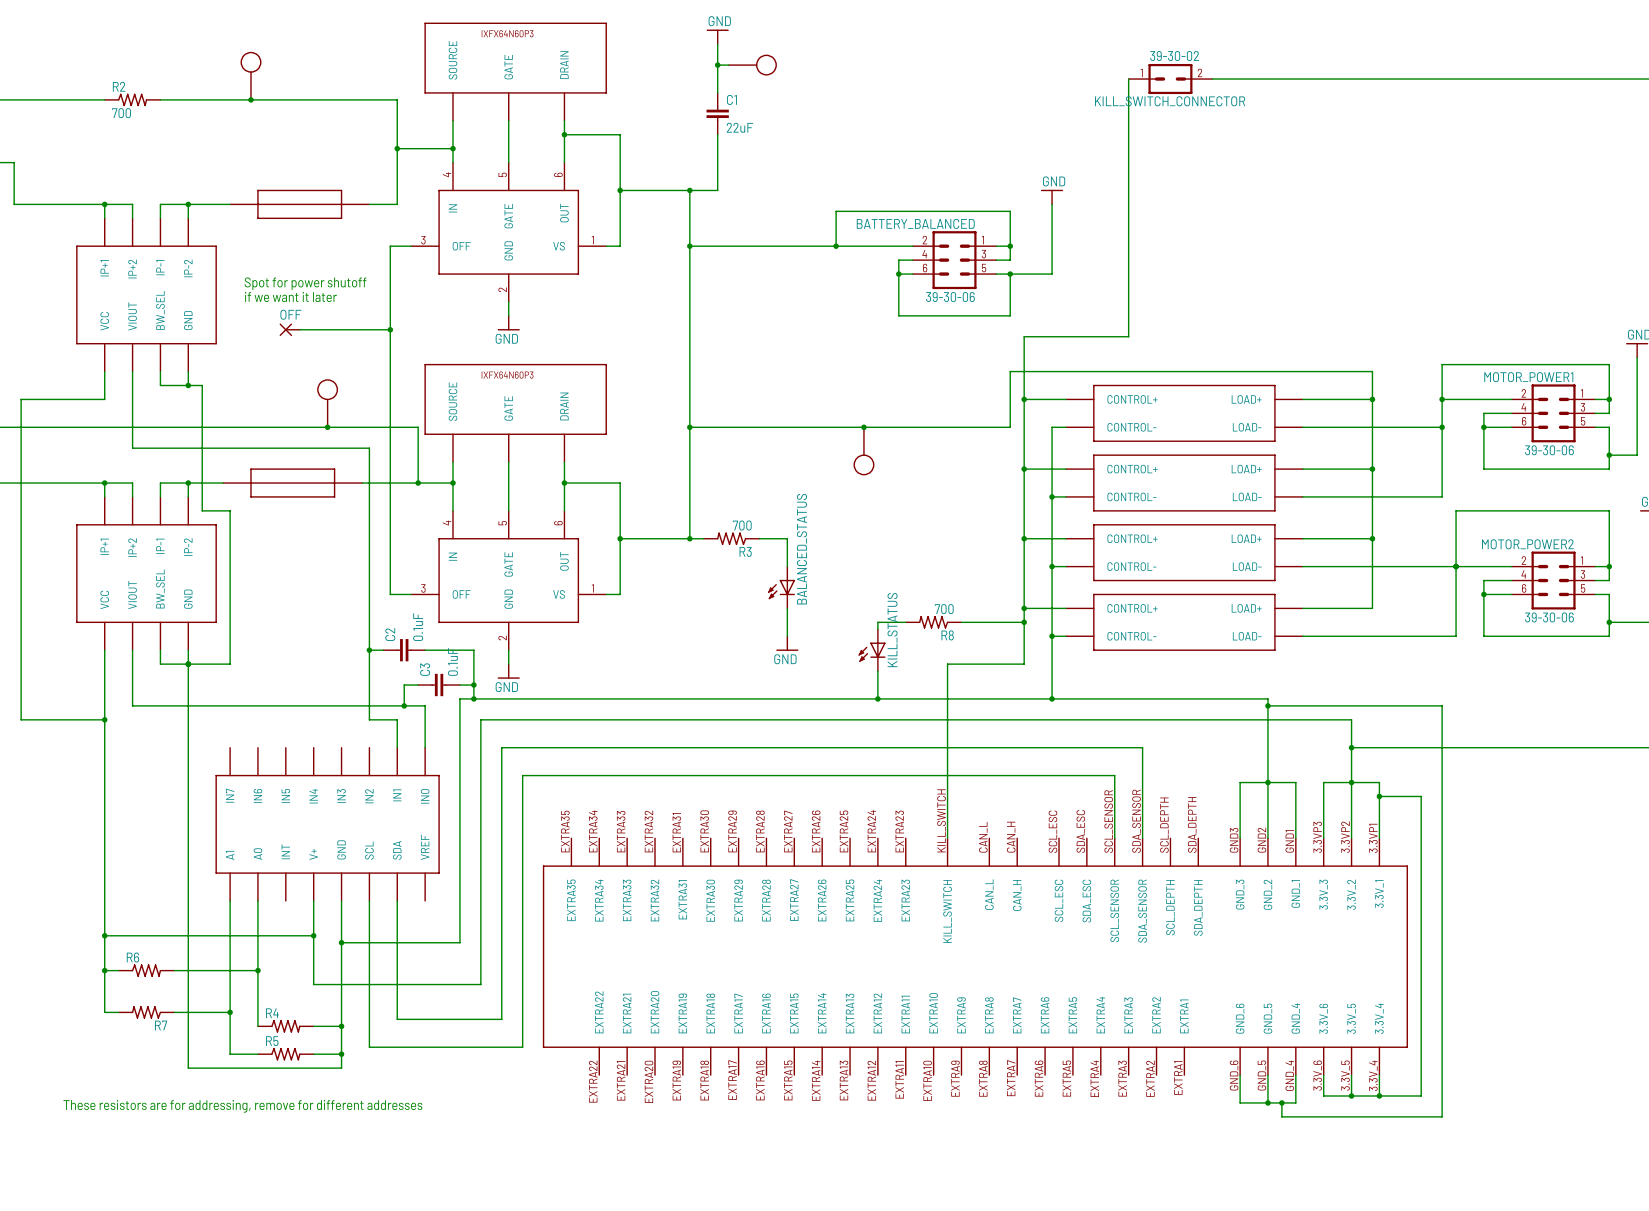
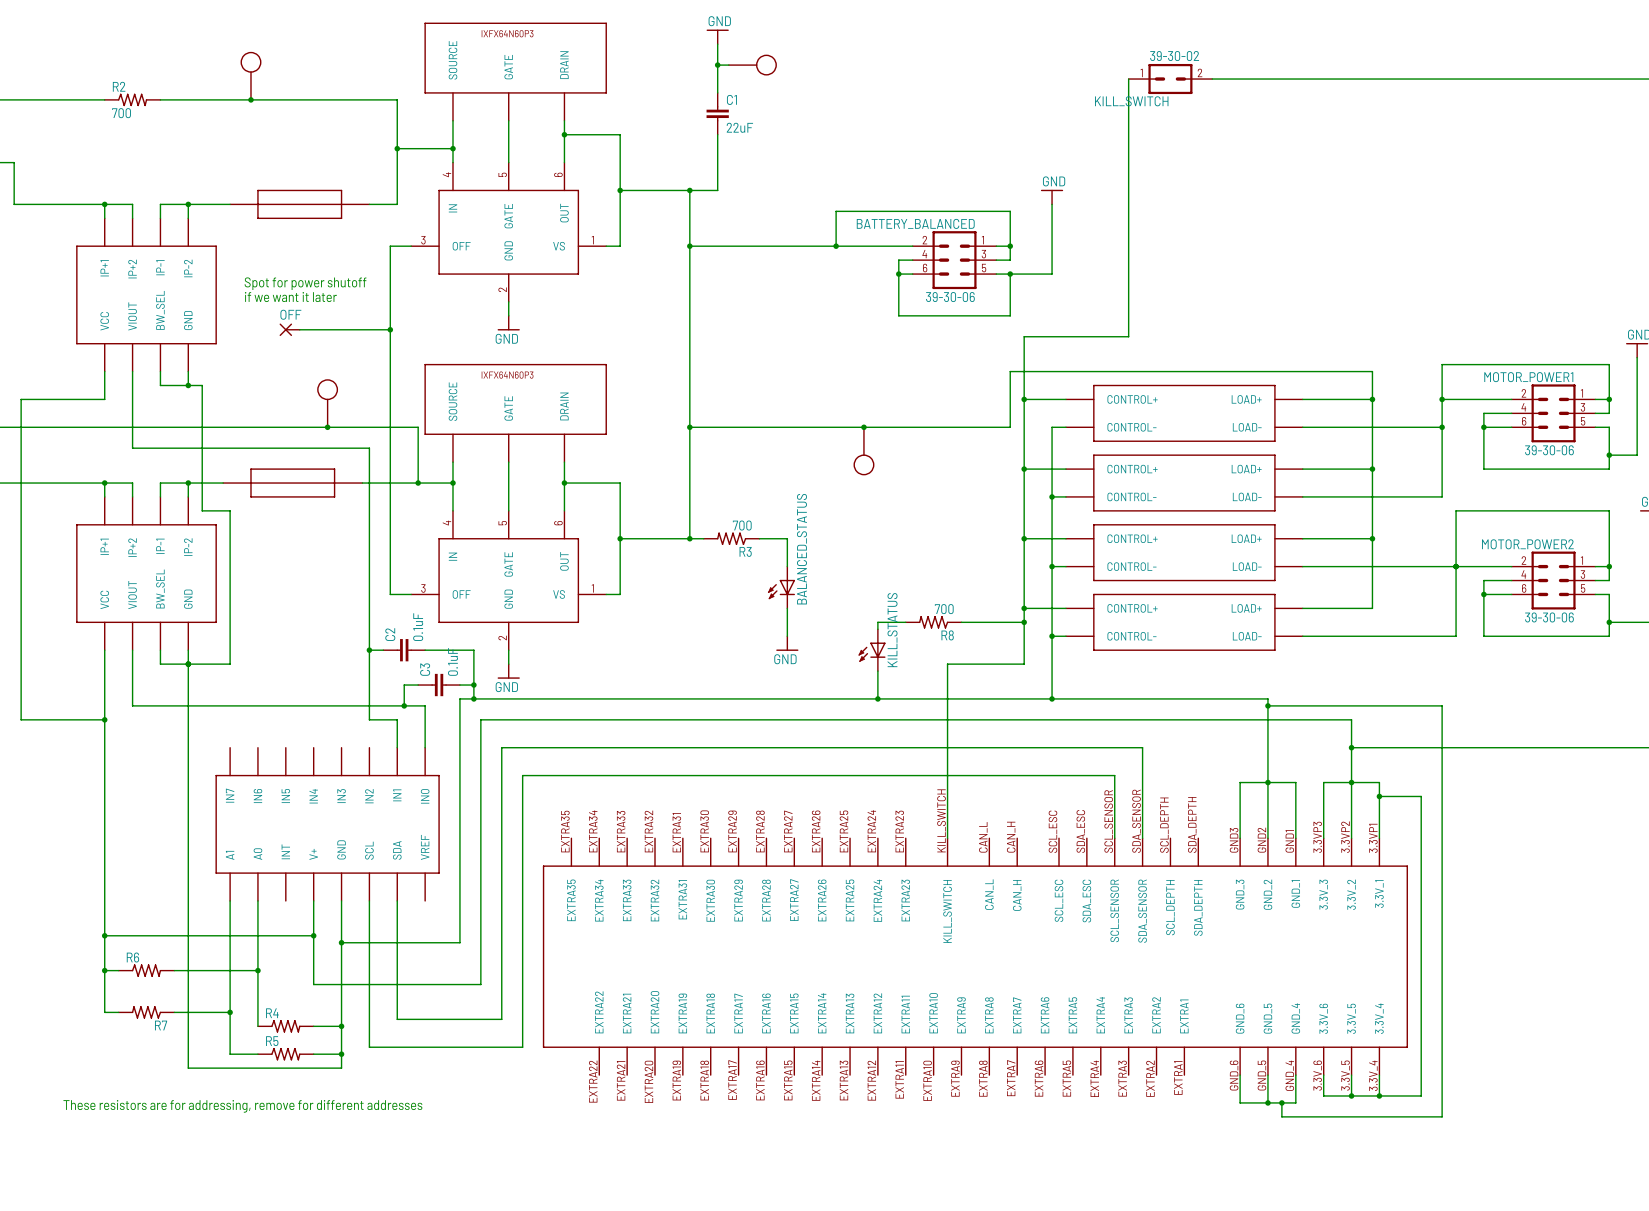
KILL_SWITCH_CONNECTOR name: KILL_SWITCH_CONNECTOR (1170, 101) -> KILL_SWITCH (1131, 101)

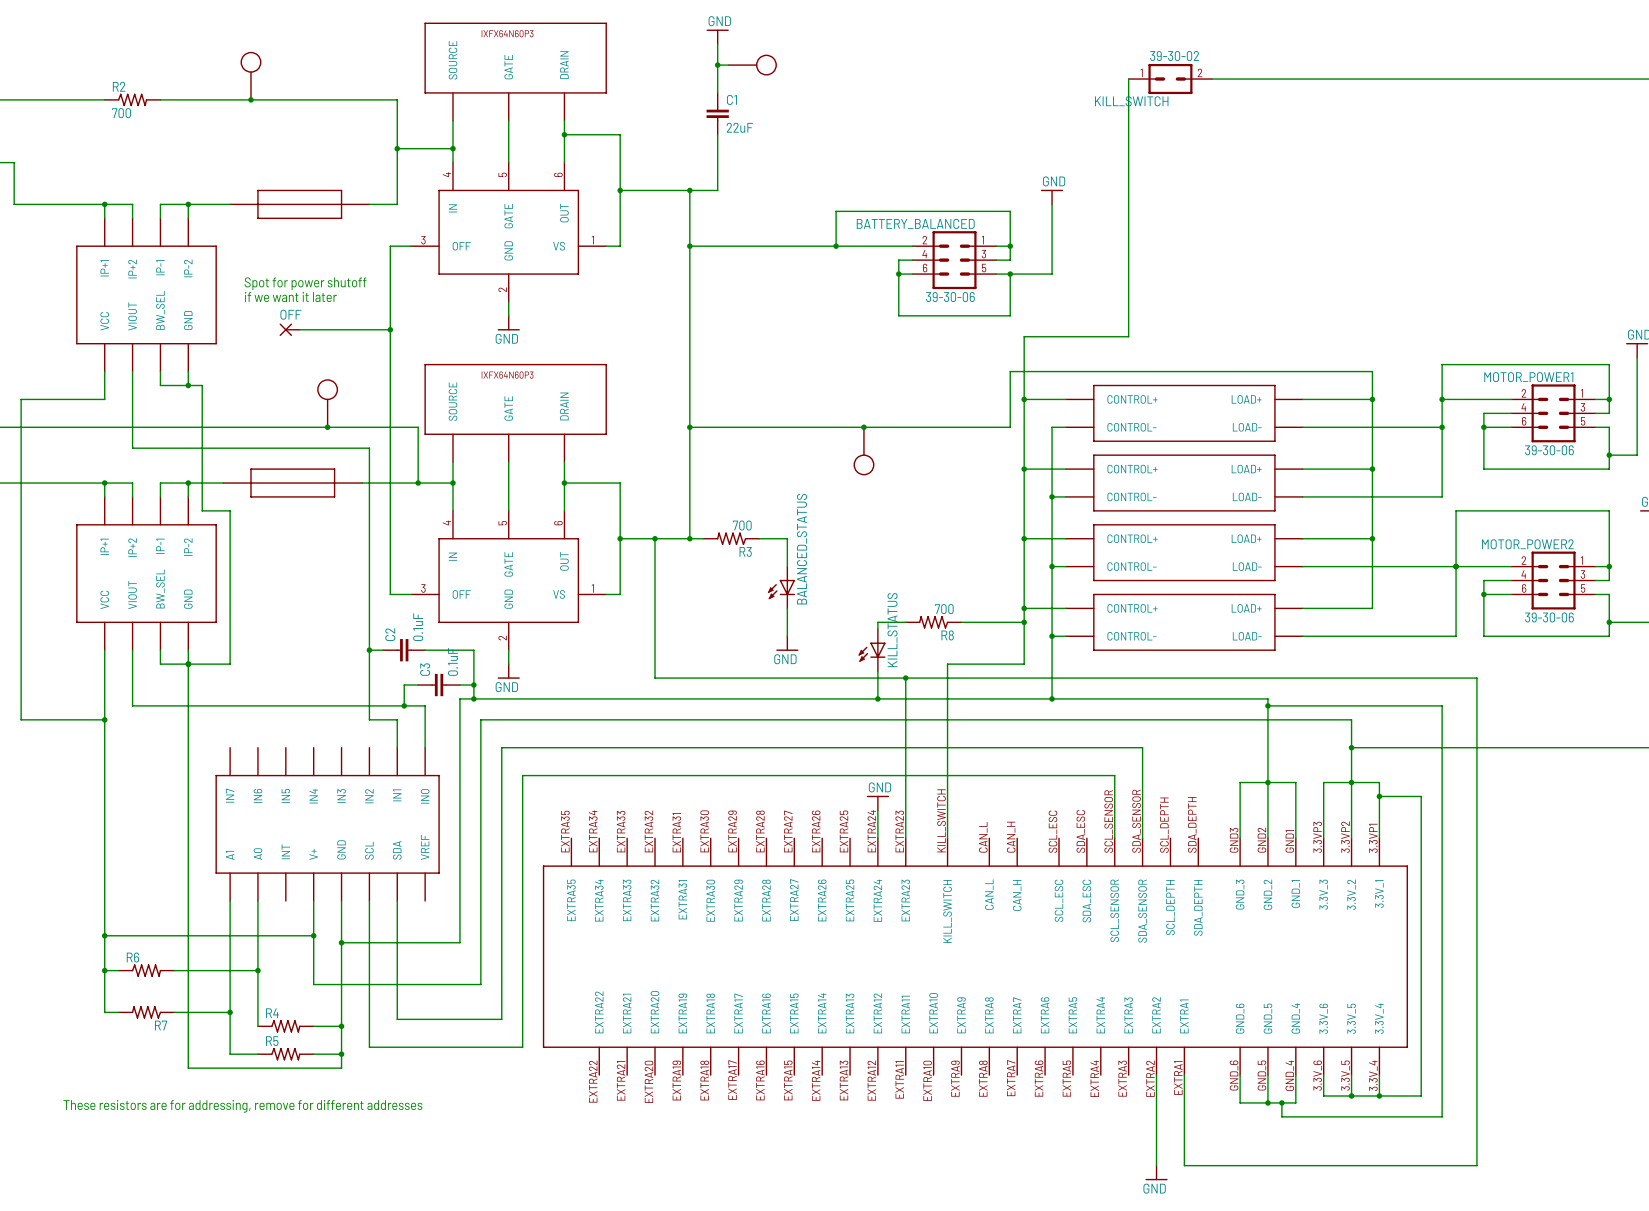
wire: none -> (655, 538) (655, 678) (1476, 678) (1476, 1165) (1184, 1165) (1184, 1075)
junction: none -> (655, 538)
wire: none -> (905, 678) (905, 838)
junction: none -> (905, 678)
power symbol: none -> GND (877, 803)
wire: none -> (877, 810) (877, 838)
wire: none -> (1156, 1075) (1156, 1165)
power symbol: none -> GND (1156, 1172)

